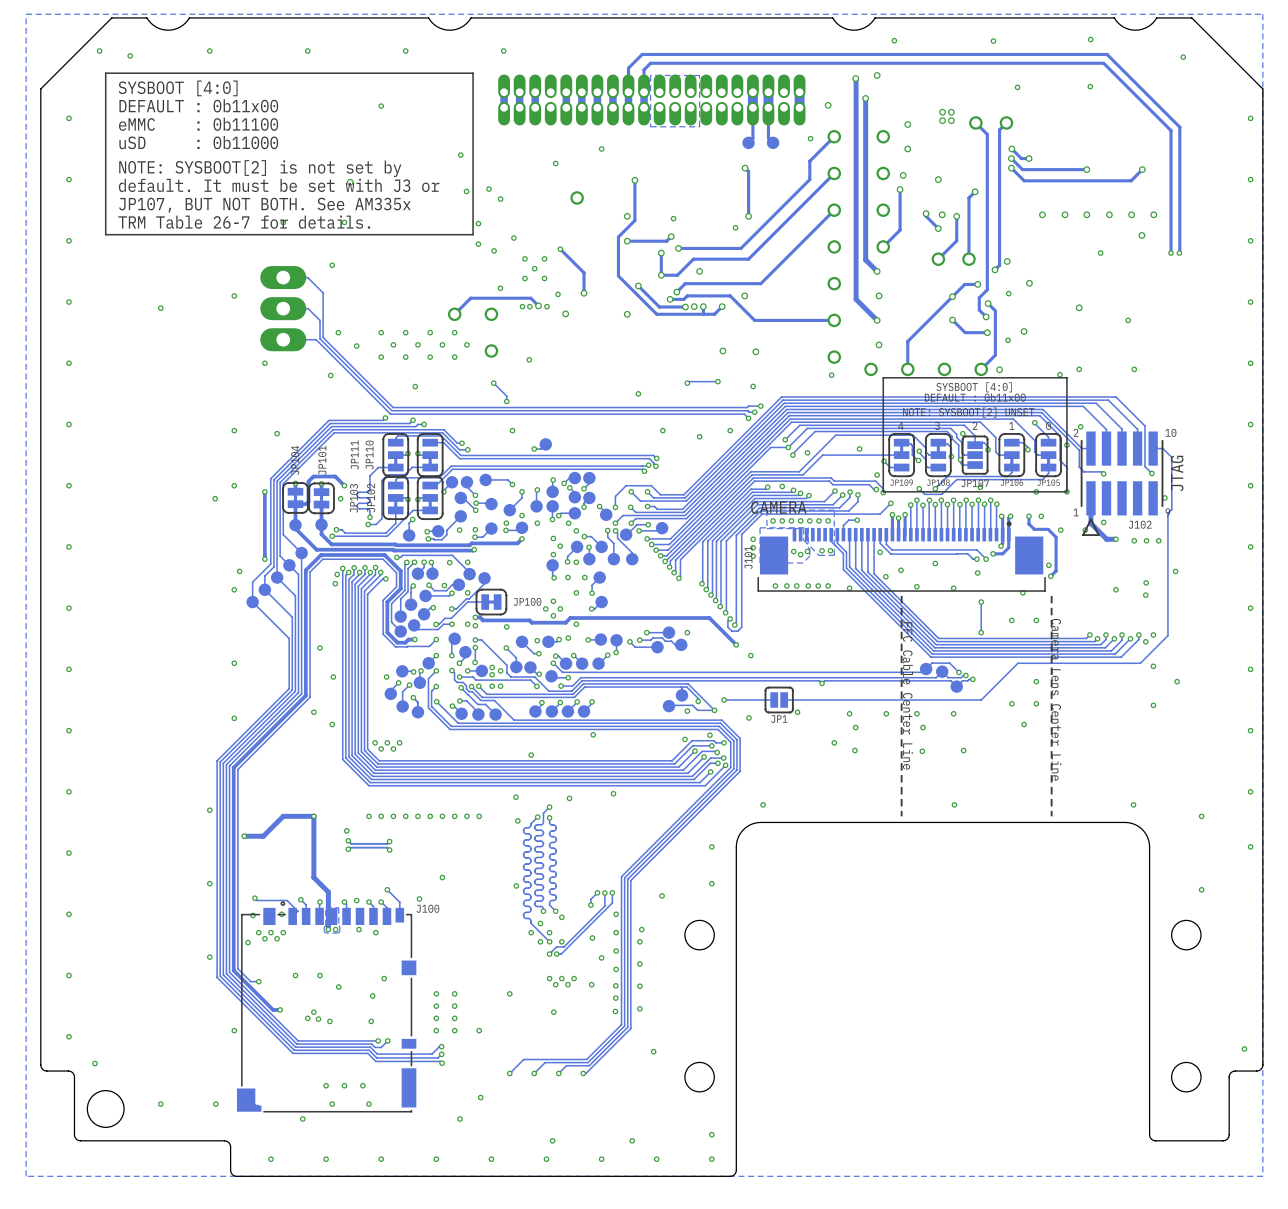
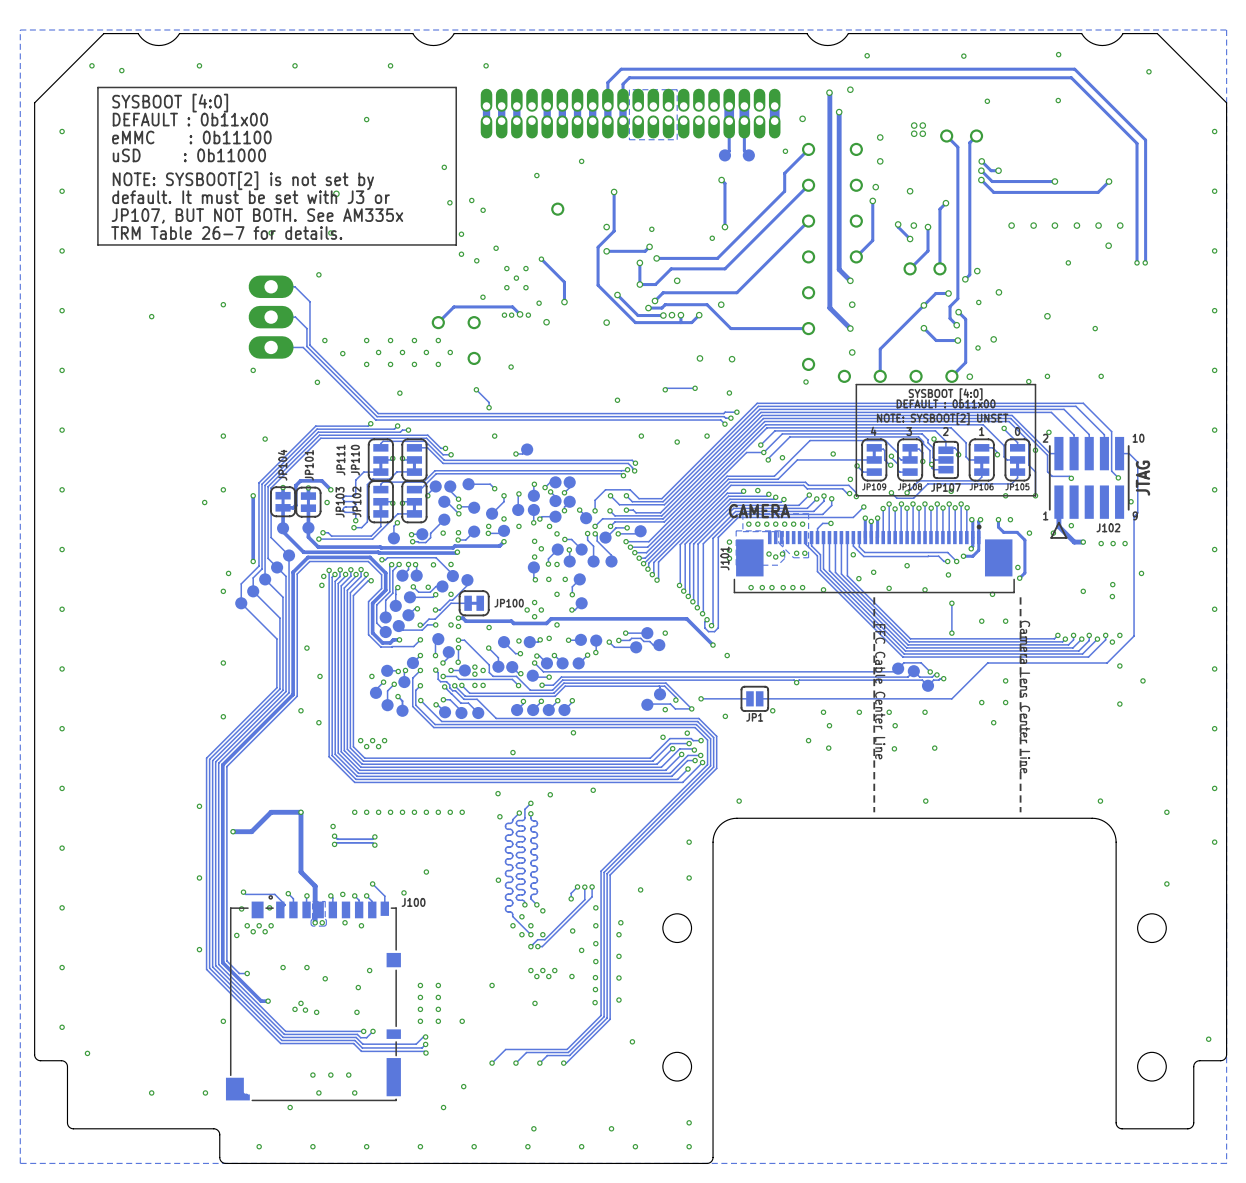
part footprint: [40, 17, 1263, 1177] -> [34, 33, 1227, 1164]

